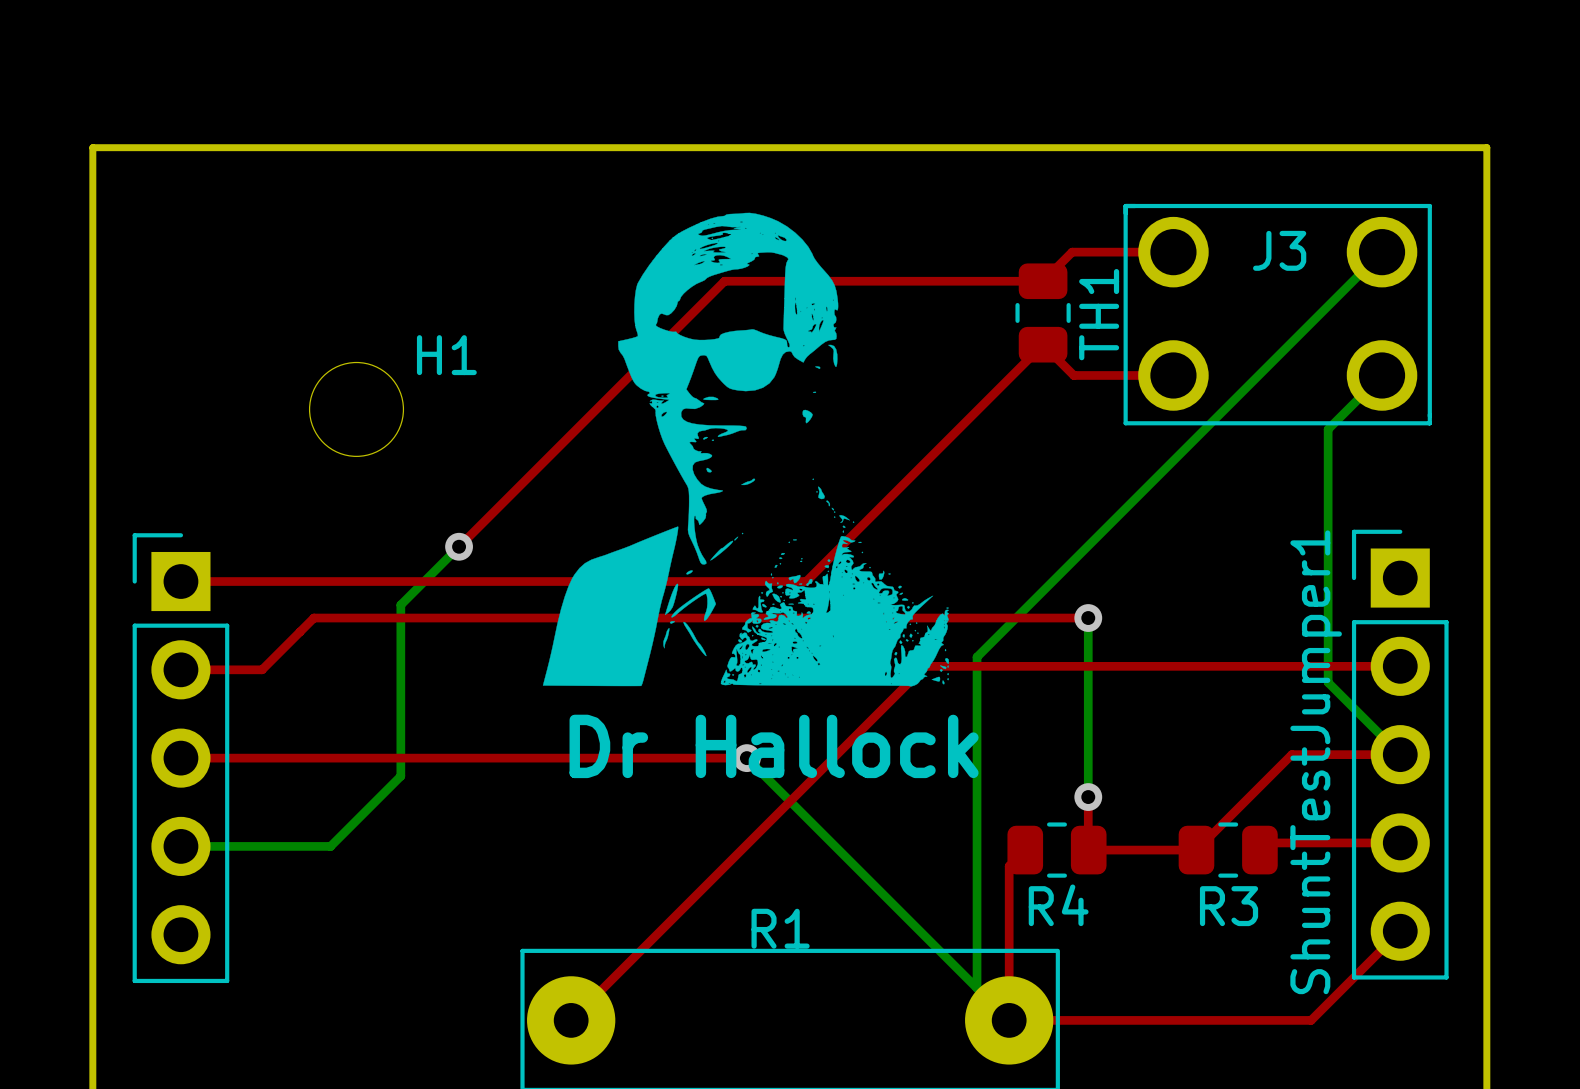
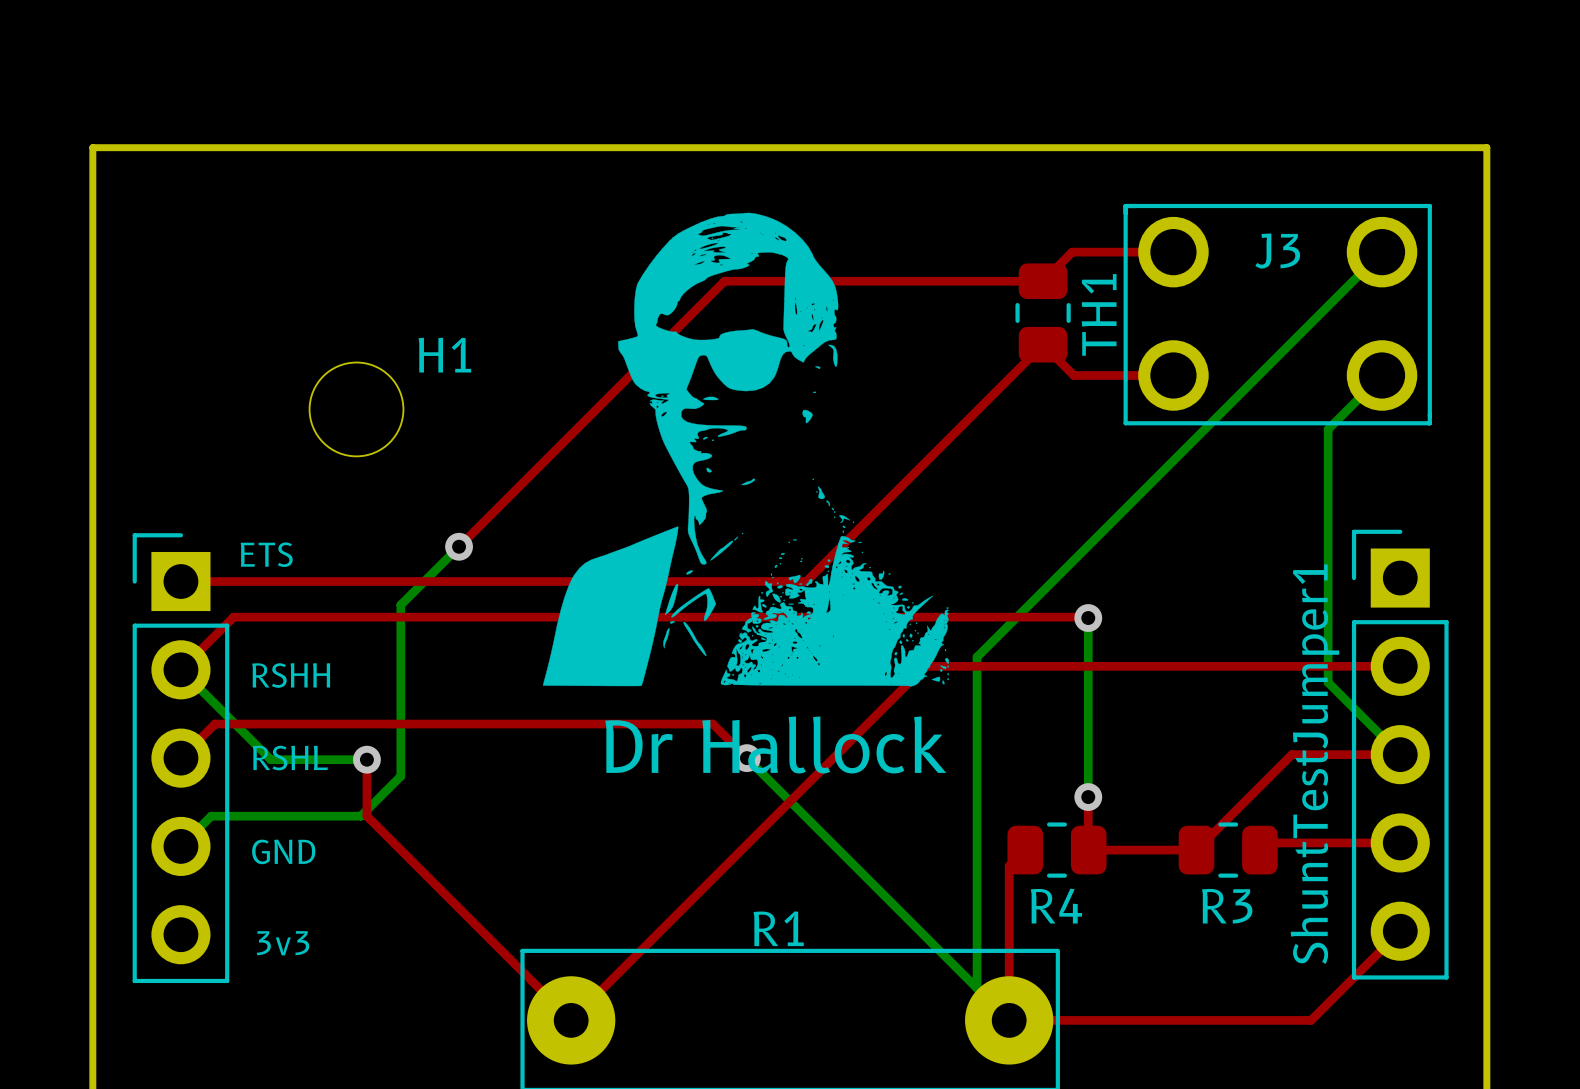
text: none -> ETS (266, 554)
top track: (1088, 618) (313, 618) (262, 669) (180, 669) -> (1088, 618) (233, 617) (180, 669)
bottom track: none -> (180, 669) (270, 759) (366, 759)
text: none -> RSHH (291, 675)
text: none -> RSHL (290, 758)
top track: (180, 758) (746, 758) -> (180, 758) (215, 724) (712, 724) (746, 758)
top track: none -> (366, 759) (366, 816) (571, 1020)
via: none -> (366, 759)
bottom track: (360, 816) (330, 846) -> none
bottom track: (180, 846) (330, 846) -> (180, 846) (211, 816) (360, 816)
text: none -> GND (283, 851)
text: none -> 3v3 (283, 943)

